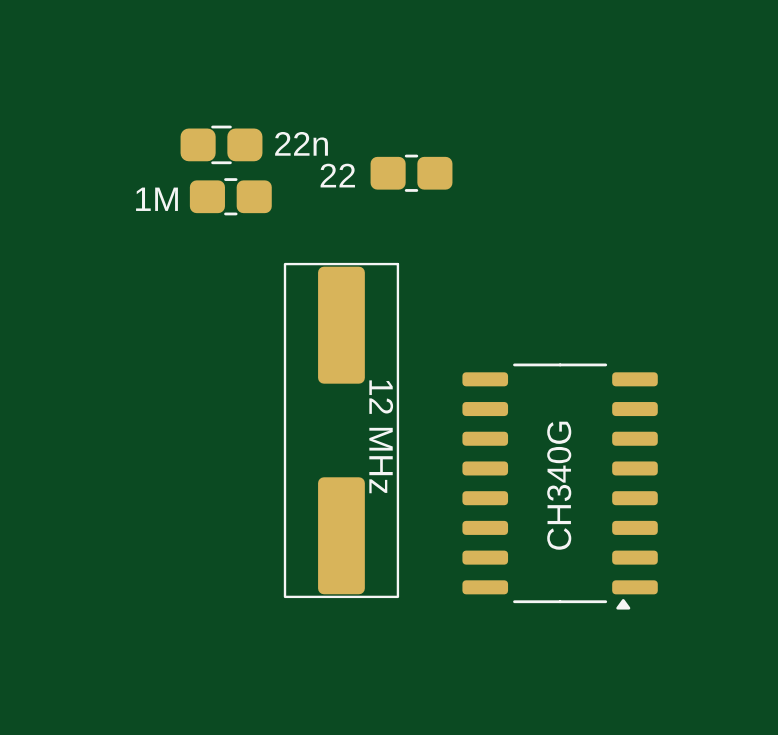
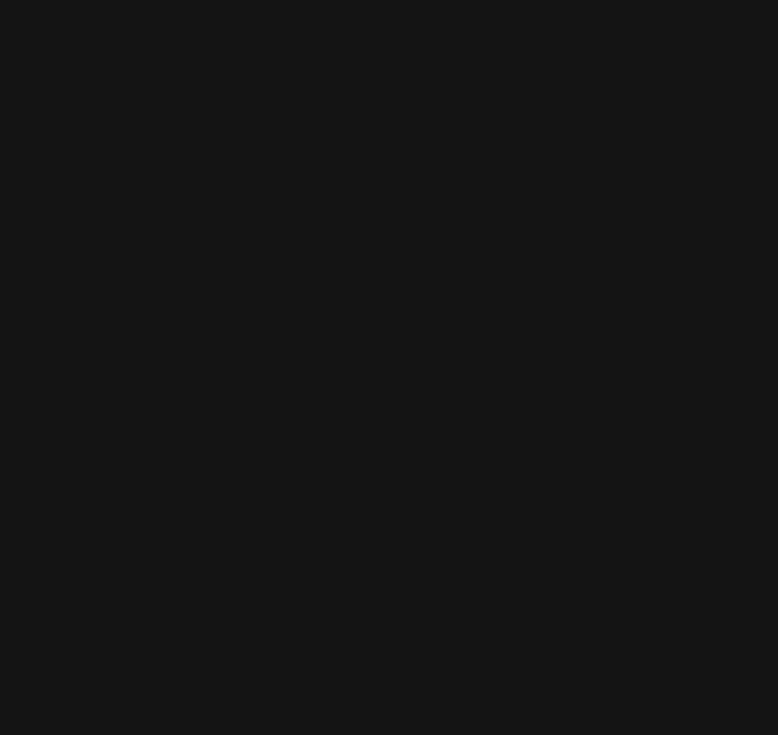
part: 22n (221, 144) -> none
part: 22 (411, 173) -> none
part: 1M (230, 196) -> none
part: 12 MHz (341, 430) -> none
part: CH340G (560, 486) -> none

